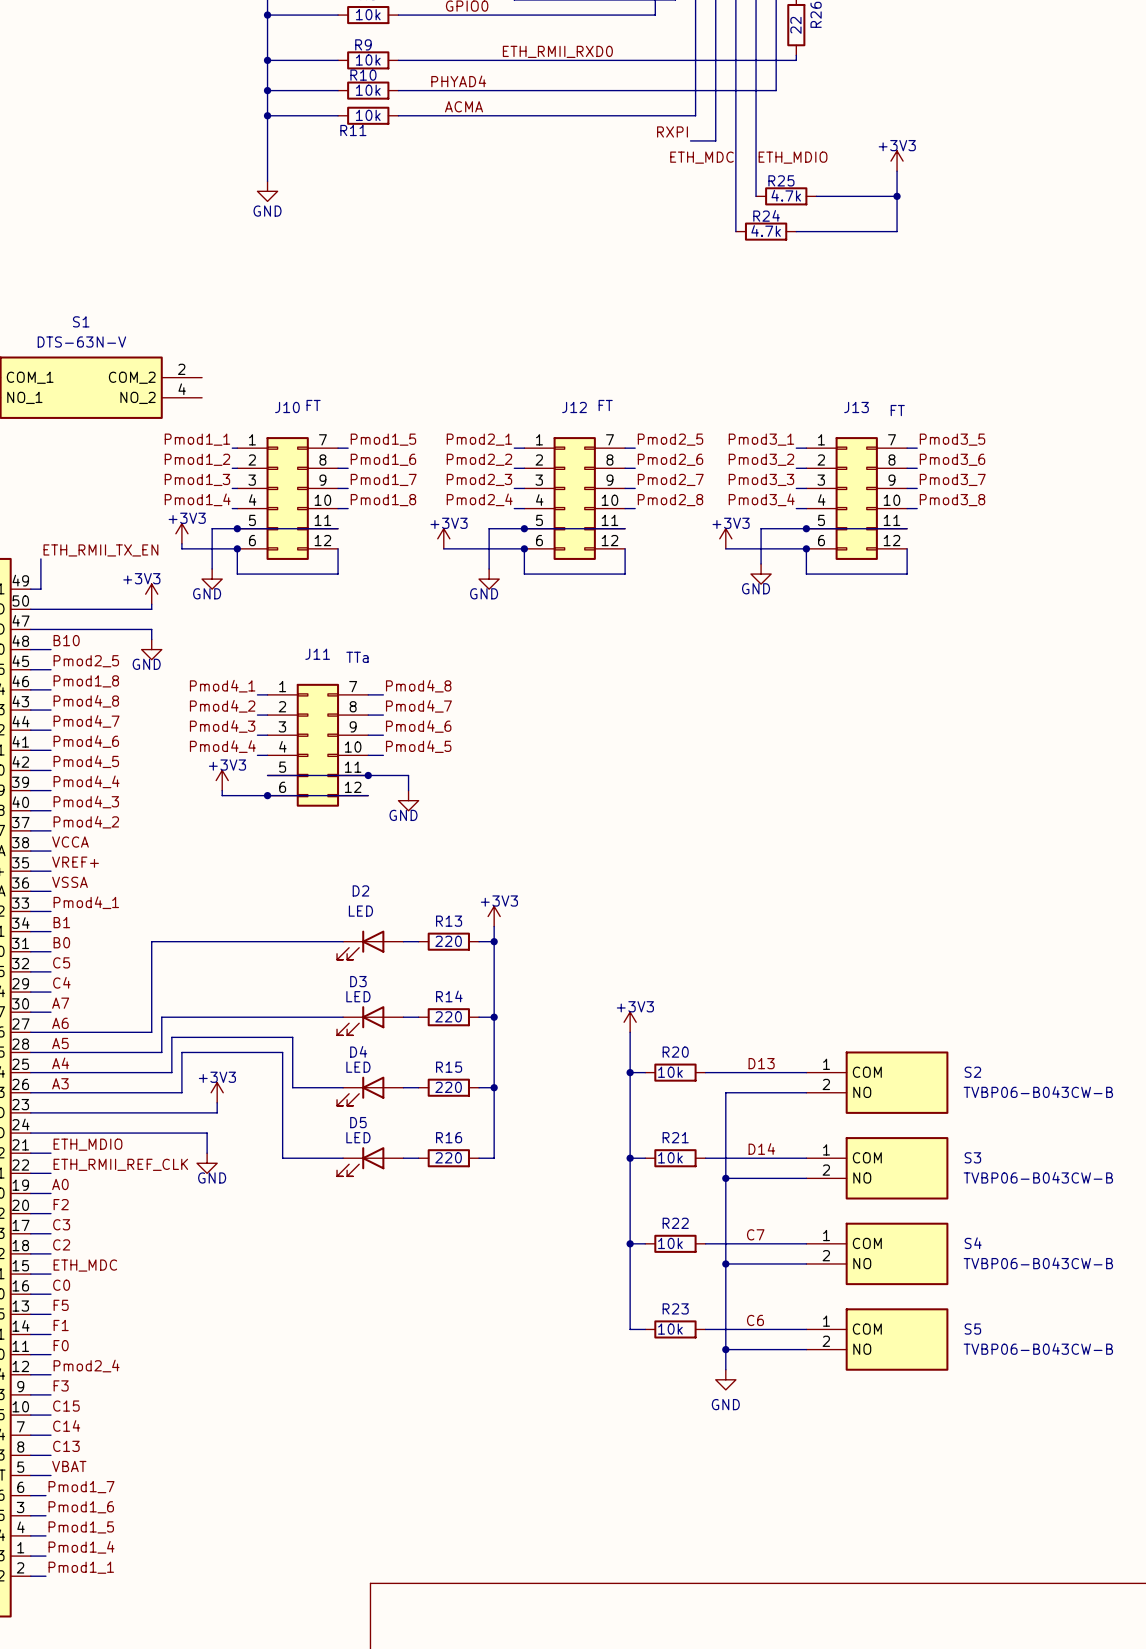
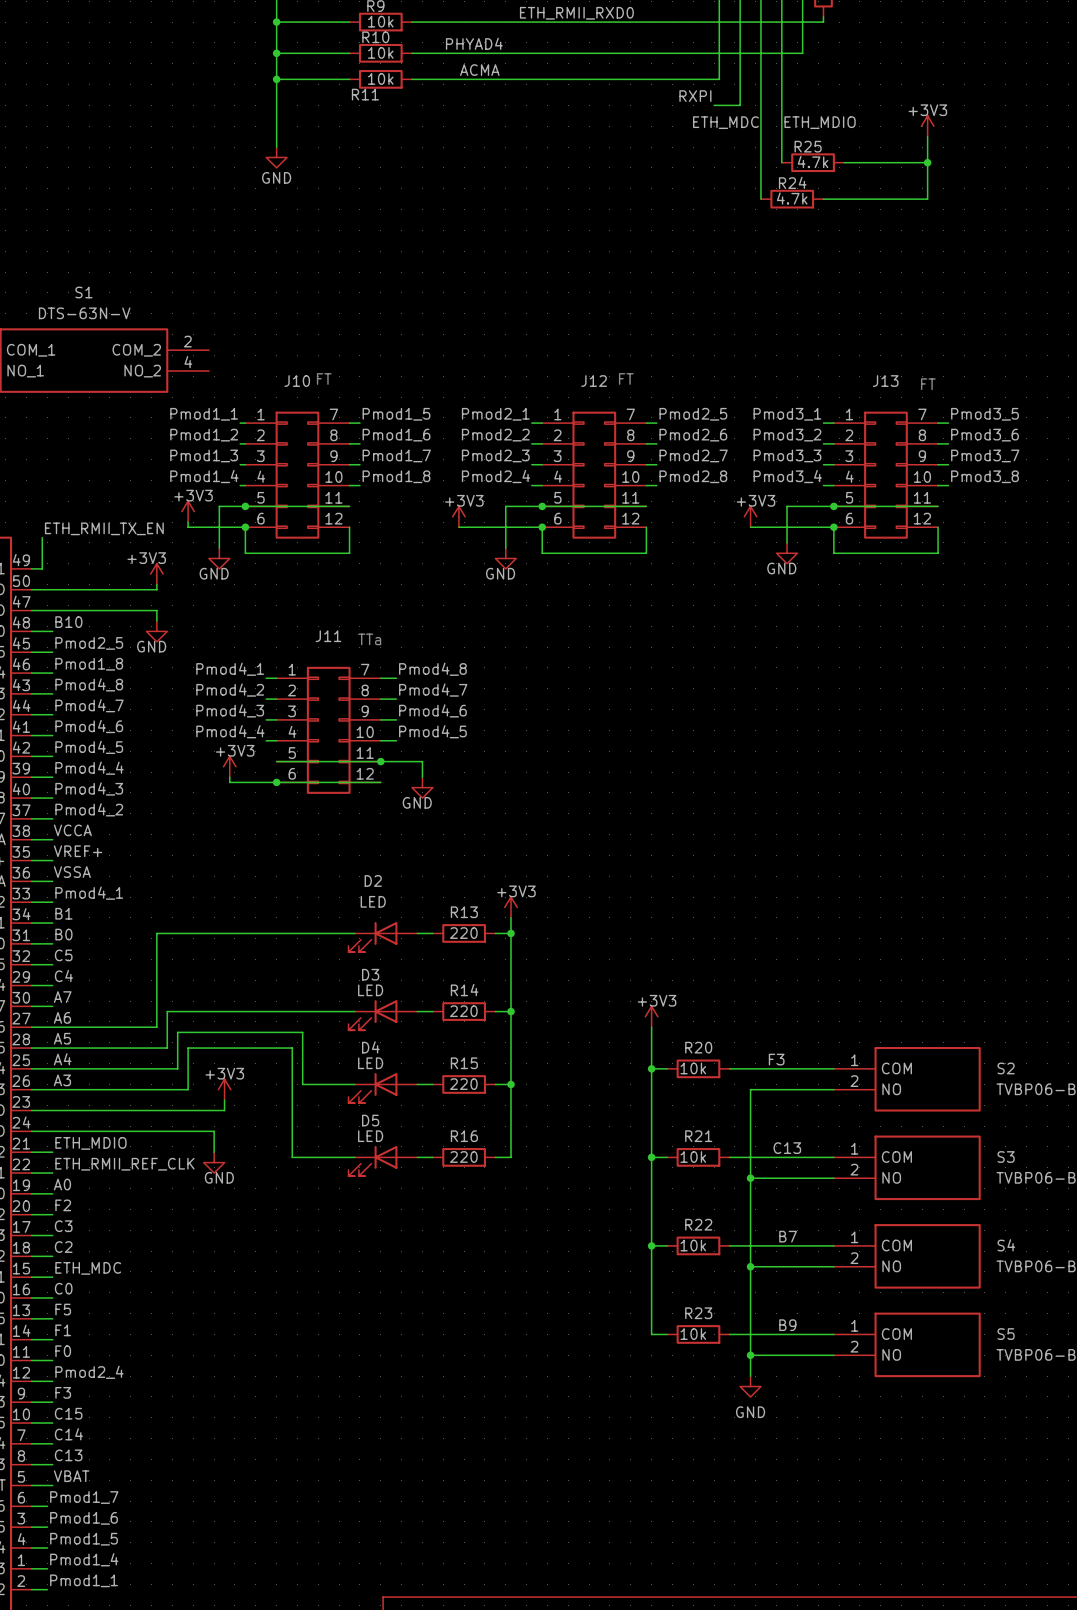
label: D13 (761, 1063) -> F3 (776, 1059)
label: D14 (761, 1148) -> C13 (787, 1148)
label: C7 (755, 1234) -> none
label: none -> B7 (788, 1236)
label: C6 (755, 1320) -> none
label: none -> B9 (787, 1325)

